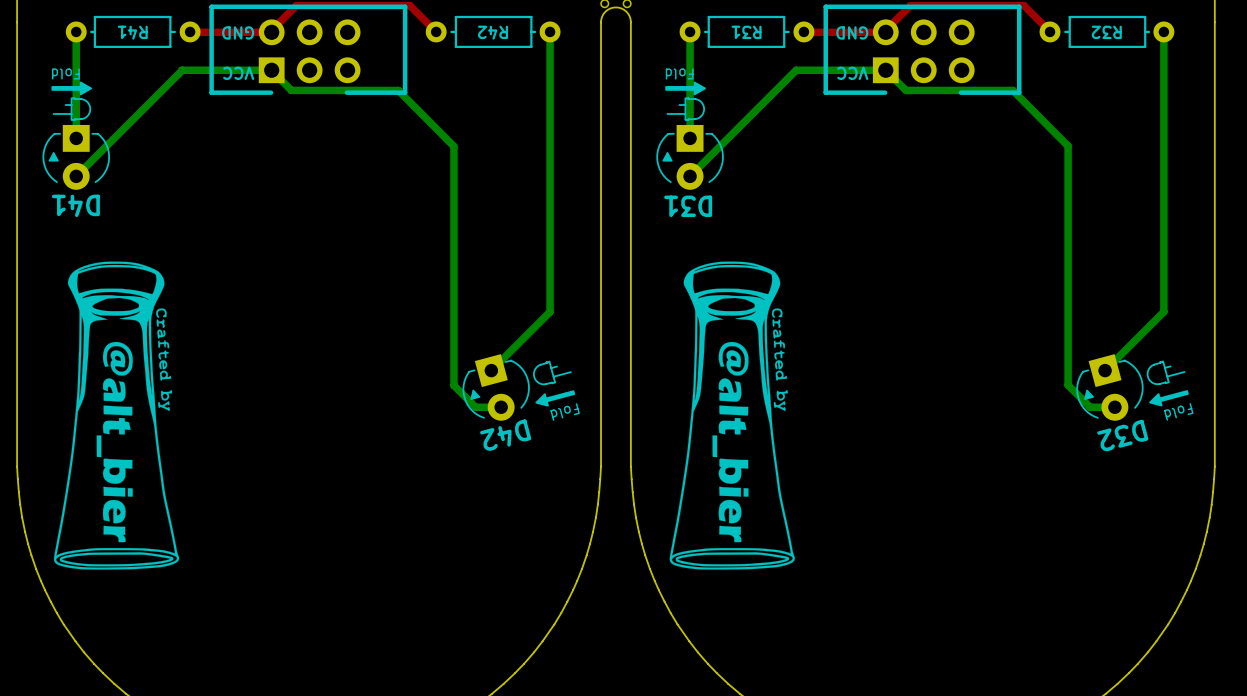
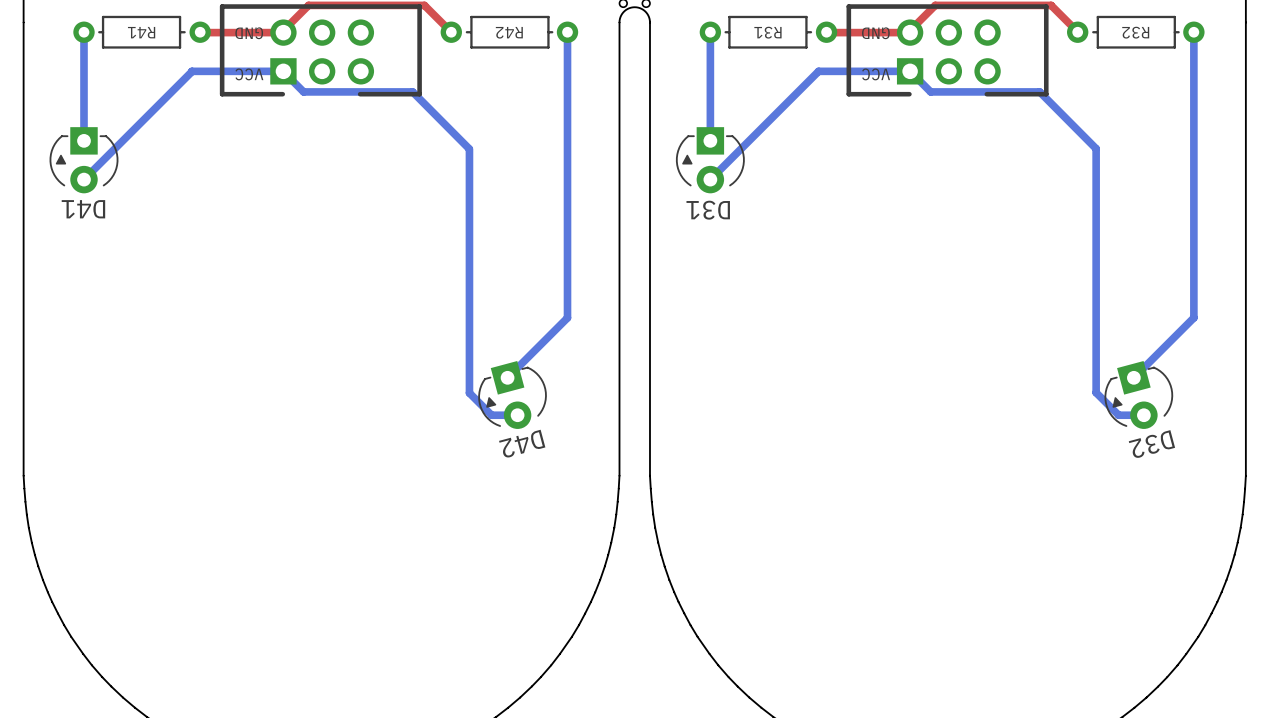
drawing: [51, 81, 93, 121] -> none
drawing: [665, 81, 706, 121] -> none
drawing: [53, 261, 180, 570] -> none
drawing: [669, 261, 795, 570] -> none
drawing: [533, 360, 576, 407] -> none
drawing: [1146, 360, 1189, 407] -> none

